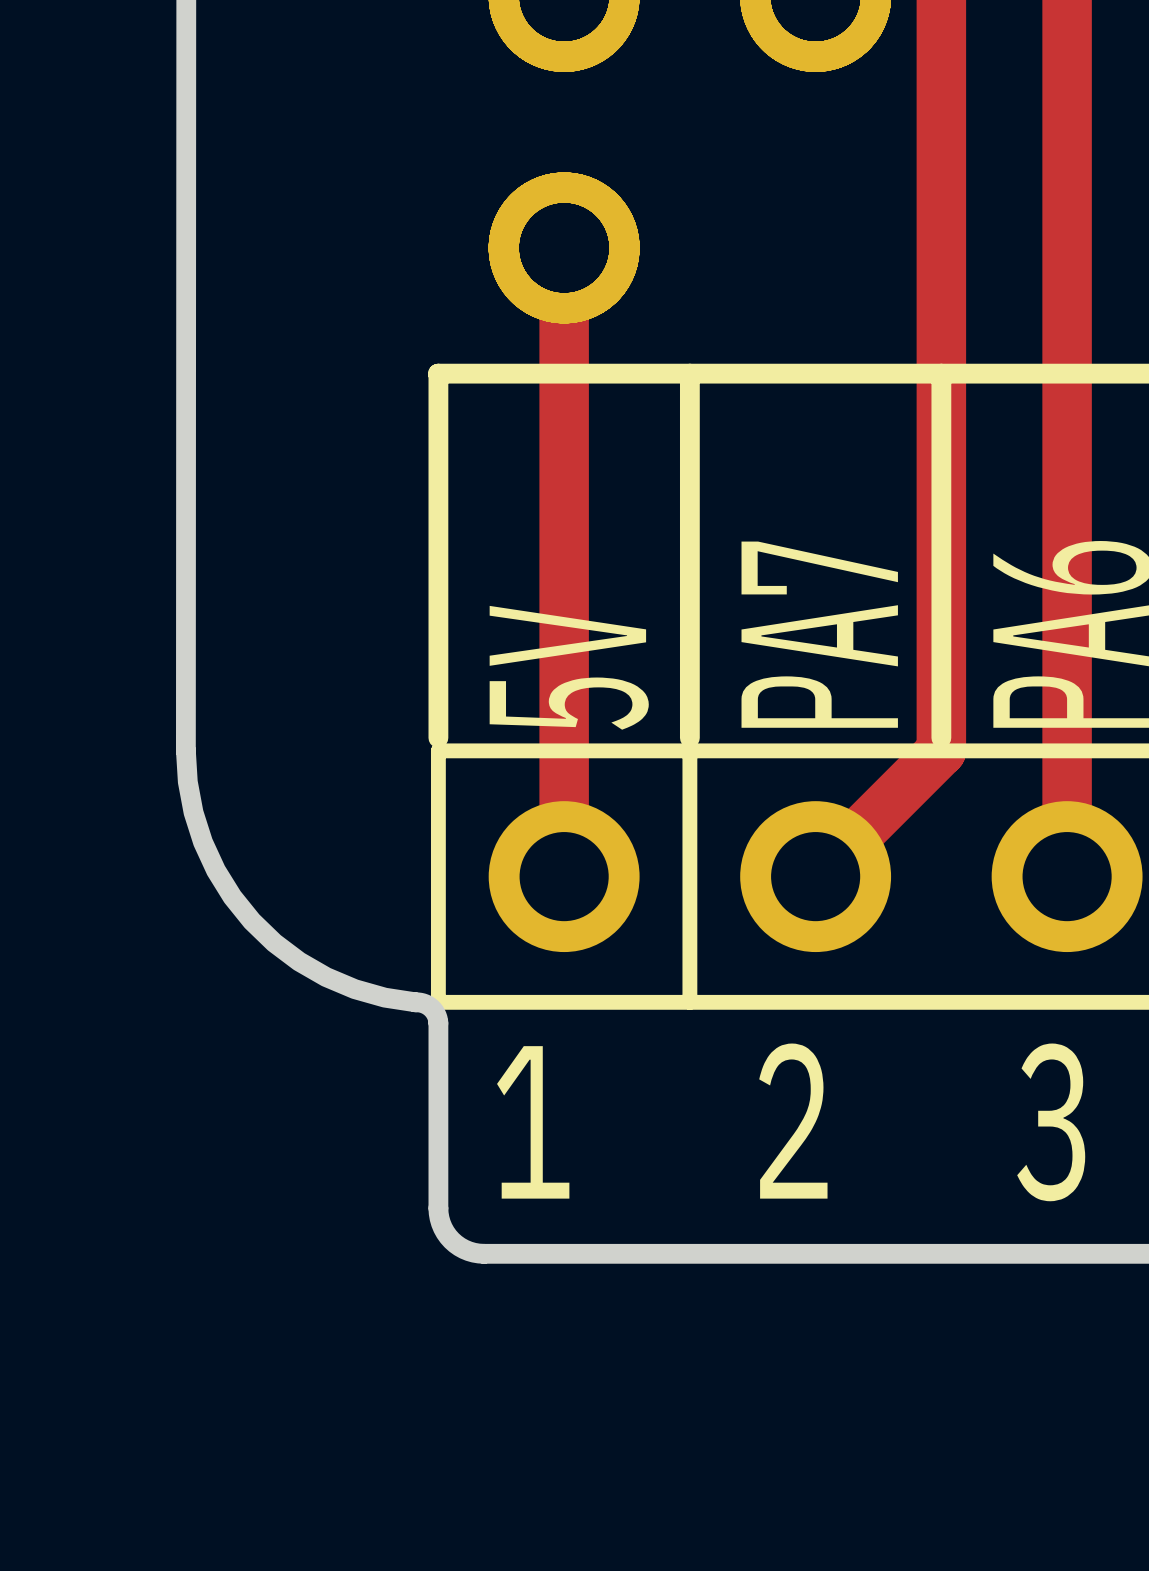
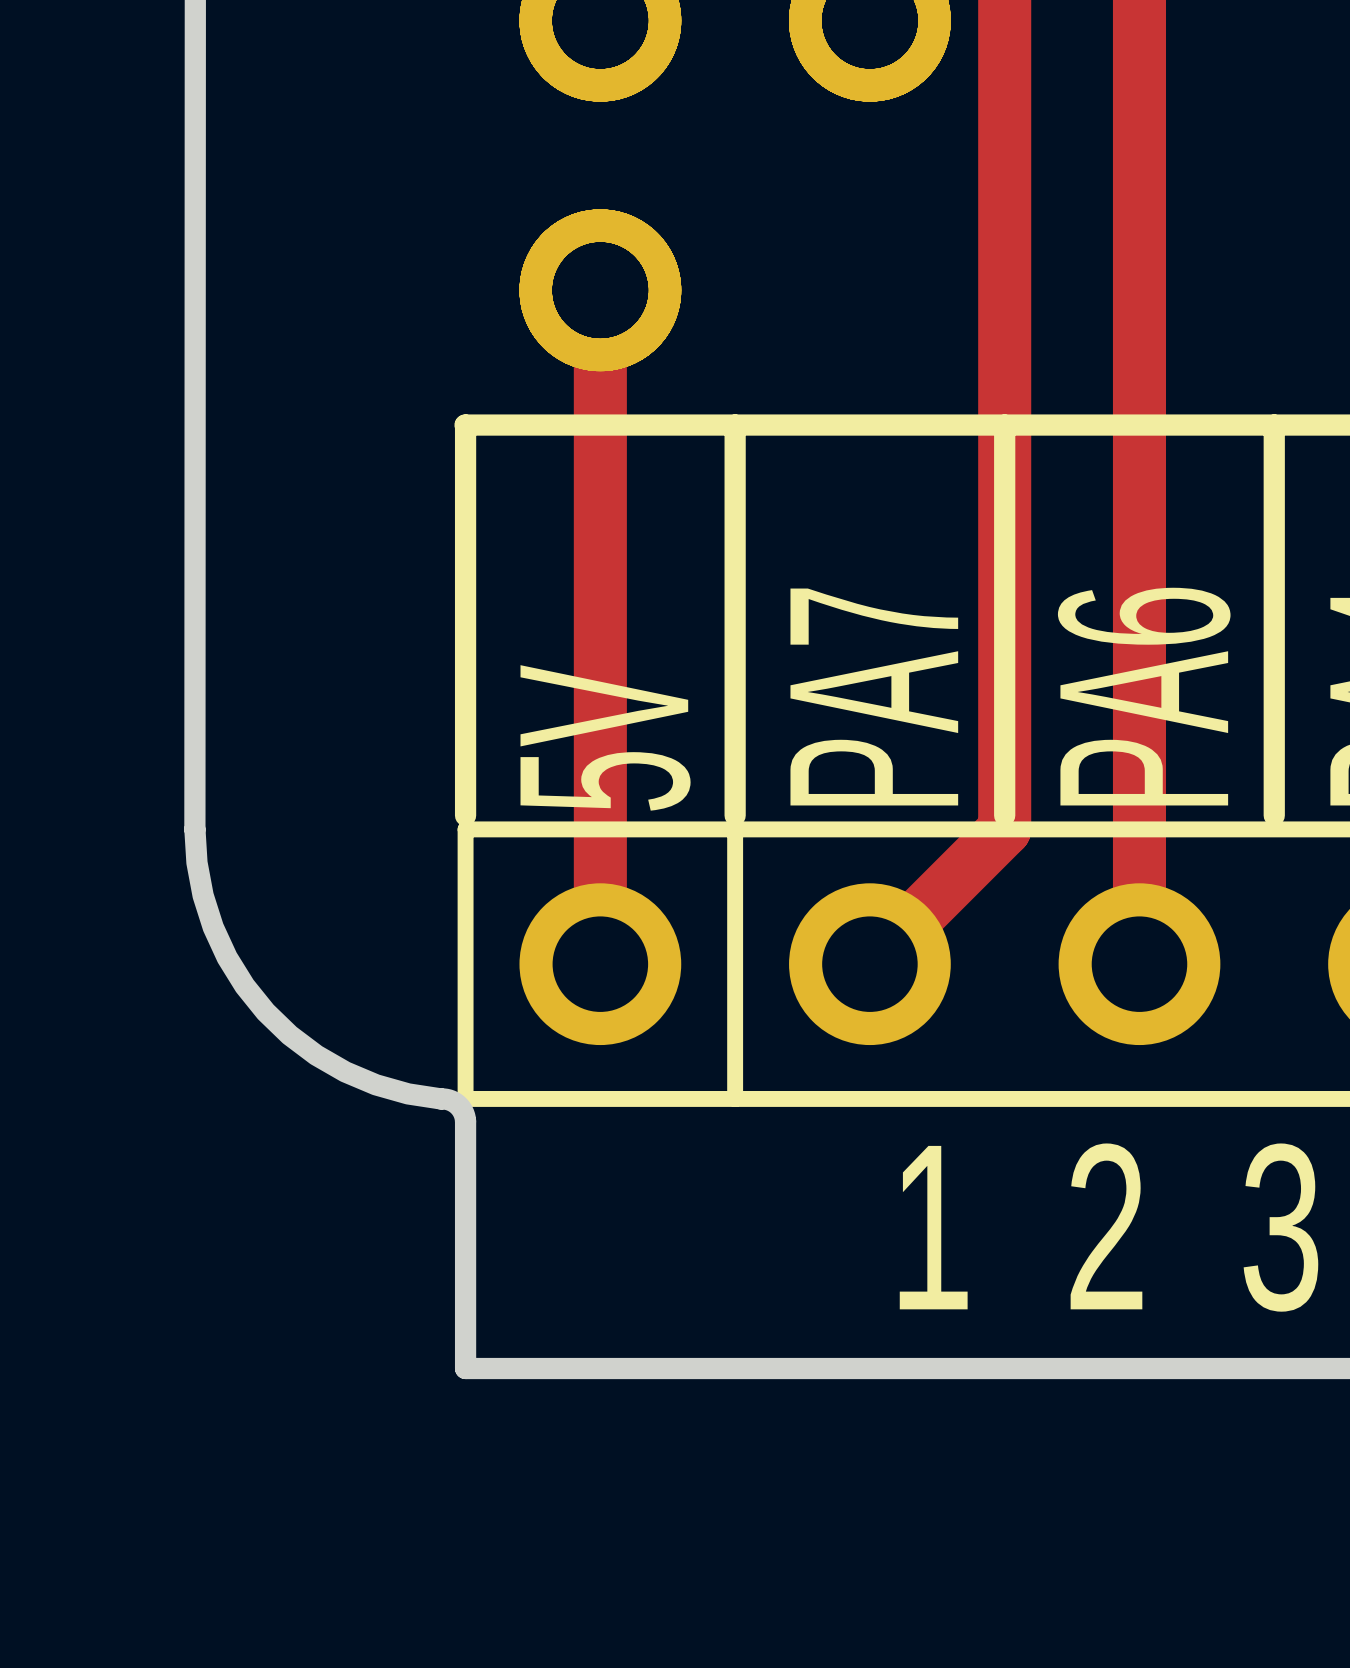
board edge: (438, 1208) (440, 1223) (451, 1240) (464, 1249) (483, 1253) -> (465, 1319) (465, 1368) (514, 1368)

